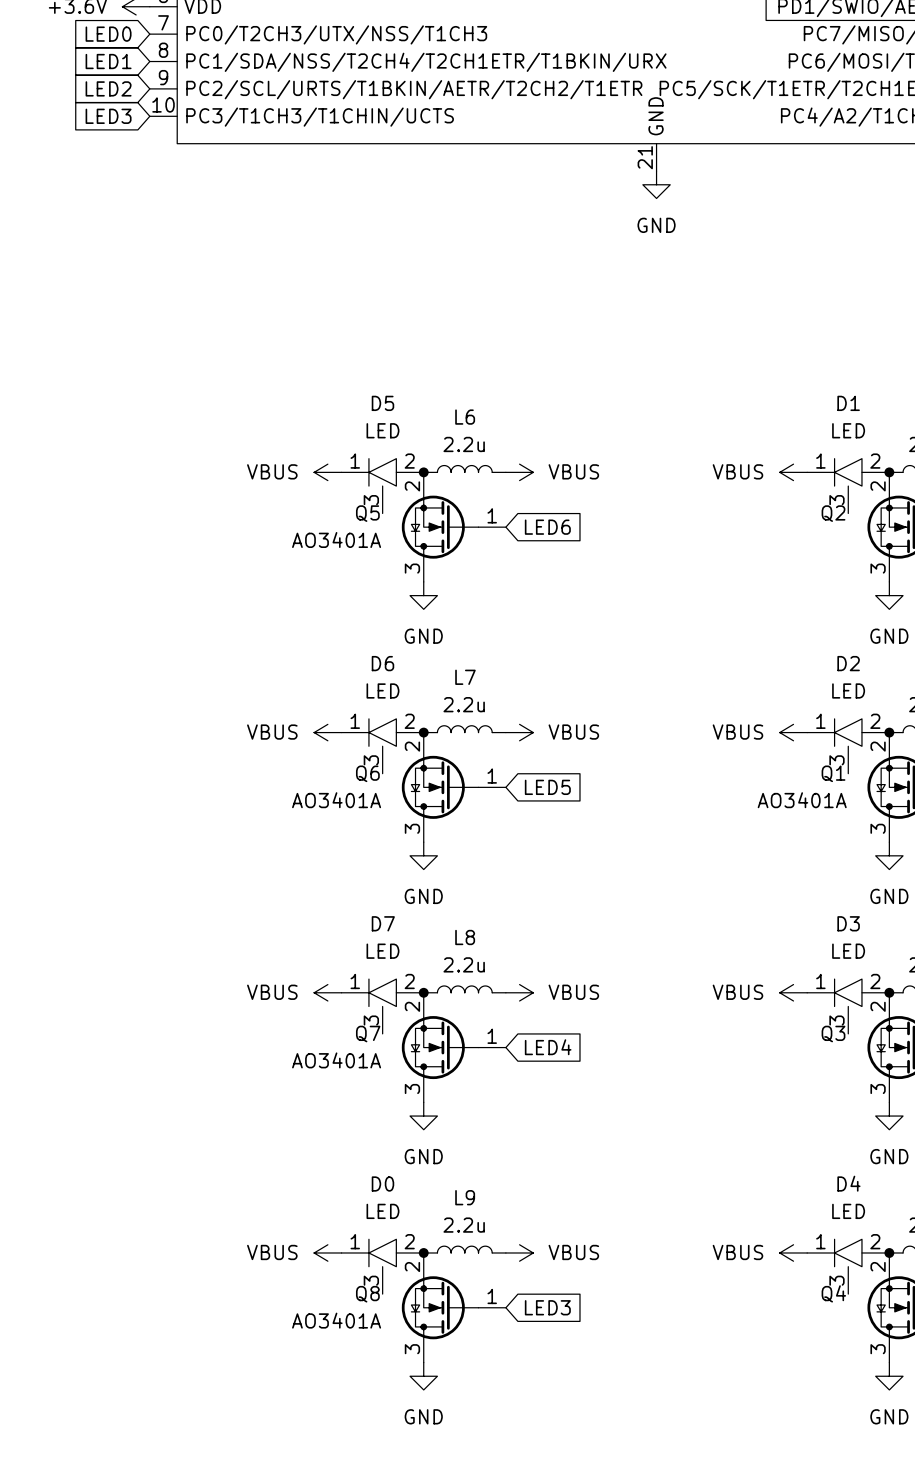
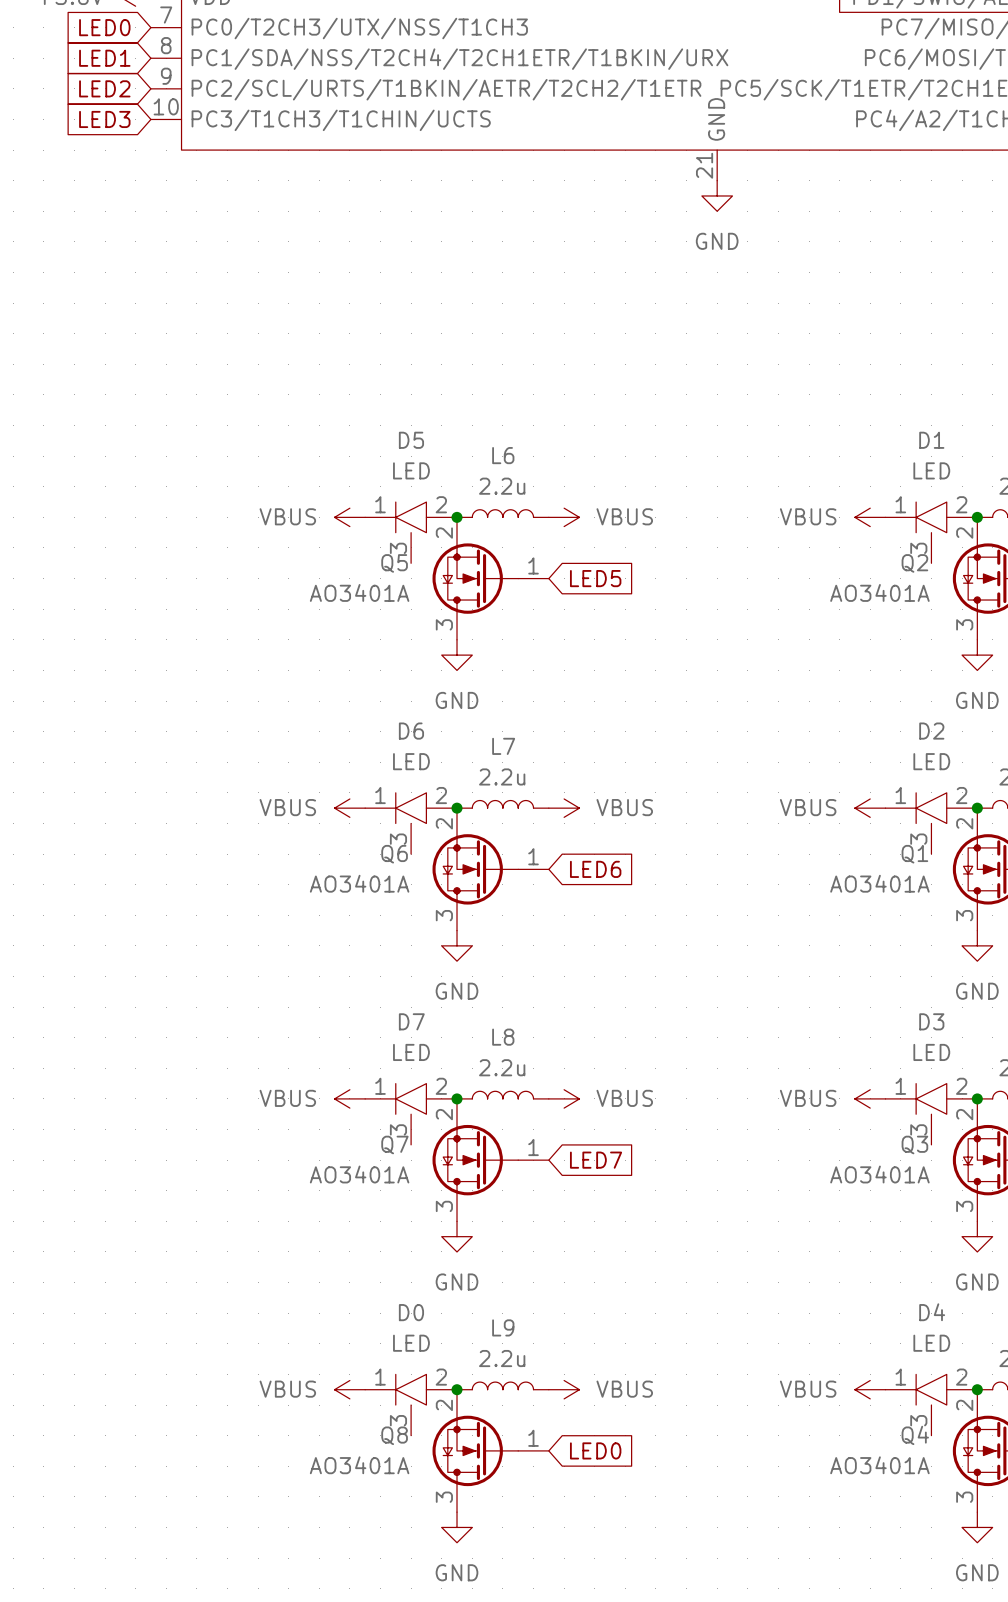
global label: LED6 (547, 527) -> LED5 (595, 578)
Q2 value: none -> AO3401A (879, 592)
global label: LED5 (547, 787) -> LED6 (595, 869)
global label: LED4 (548, 1047) -> LED7 (596, 1160)
Q3 value: none -> AO3401A (879, 1174)
global label: LED3 (547, 1307) -> LED0 (595, 1450)
Q4 value: none -> AO3401A (879, 1465)

